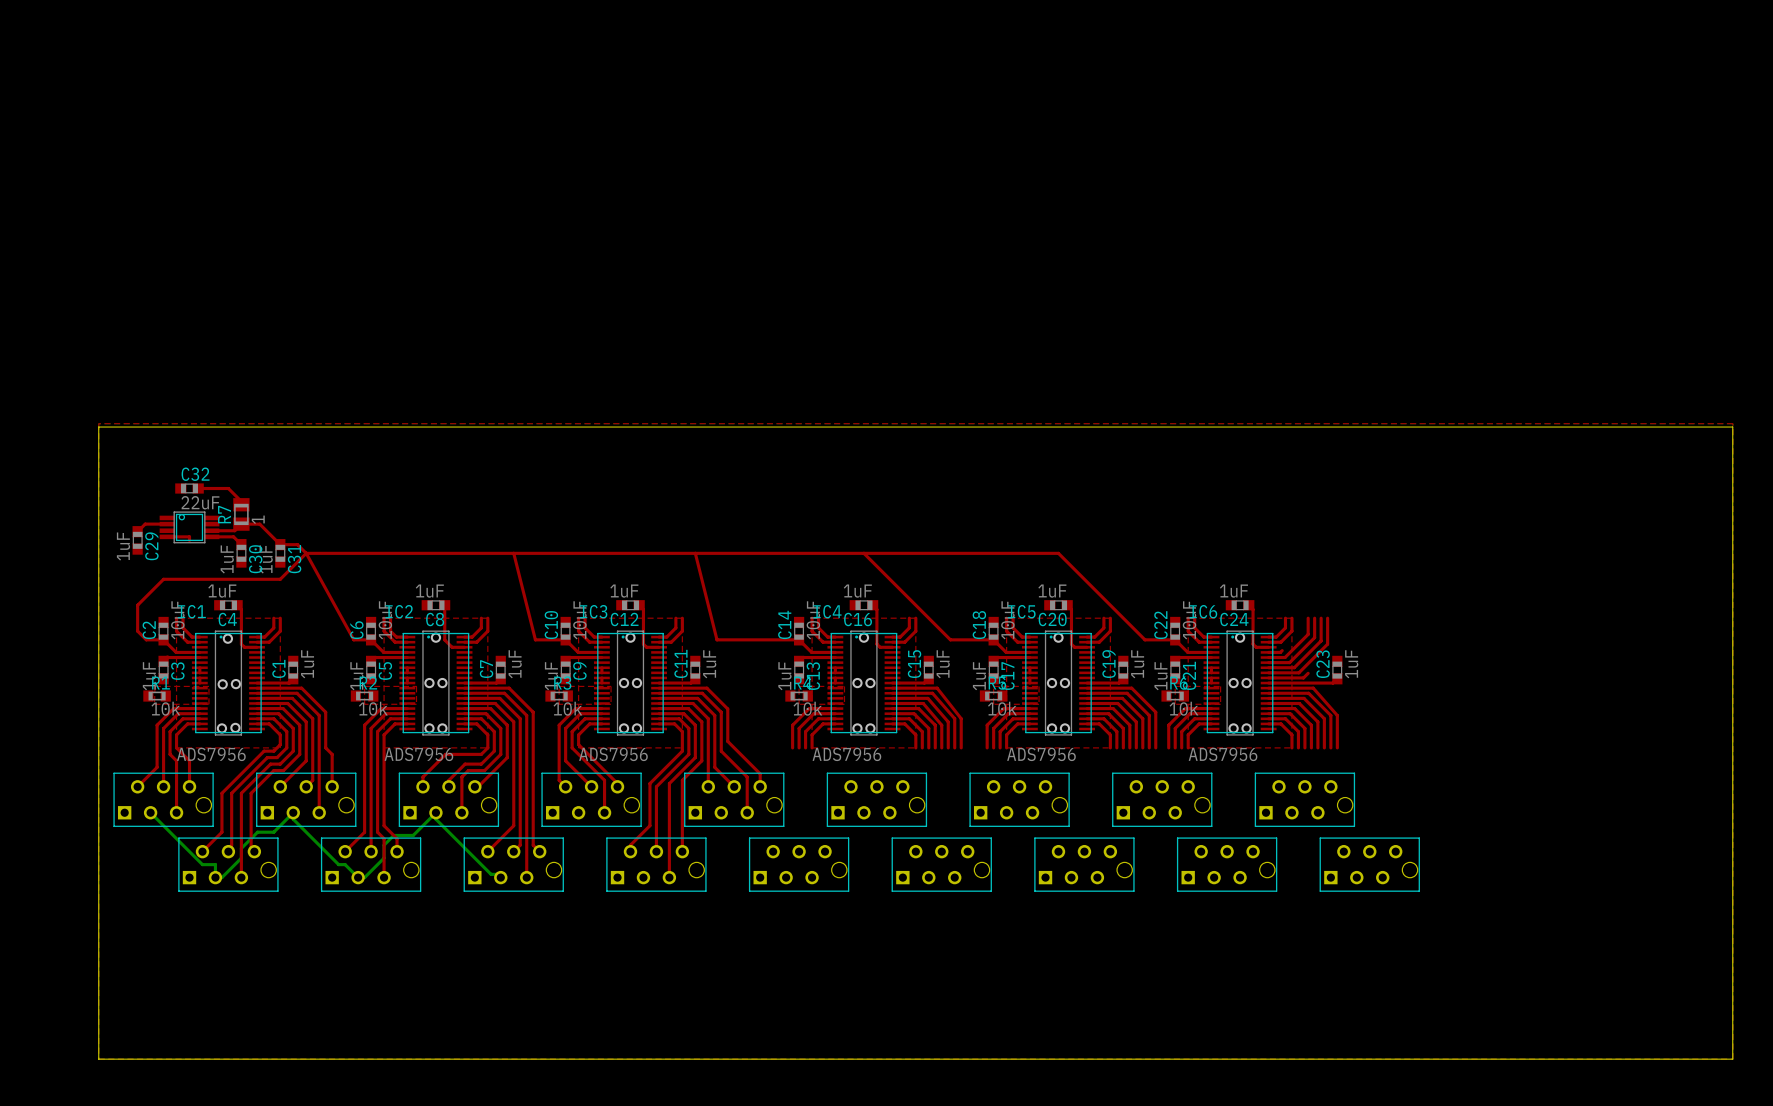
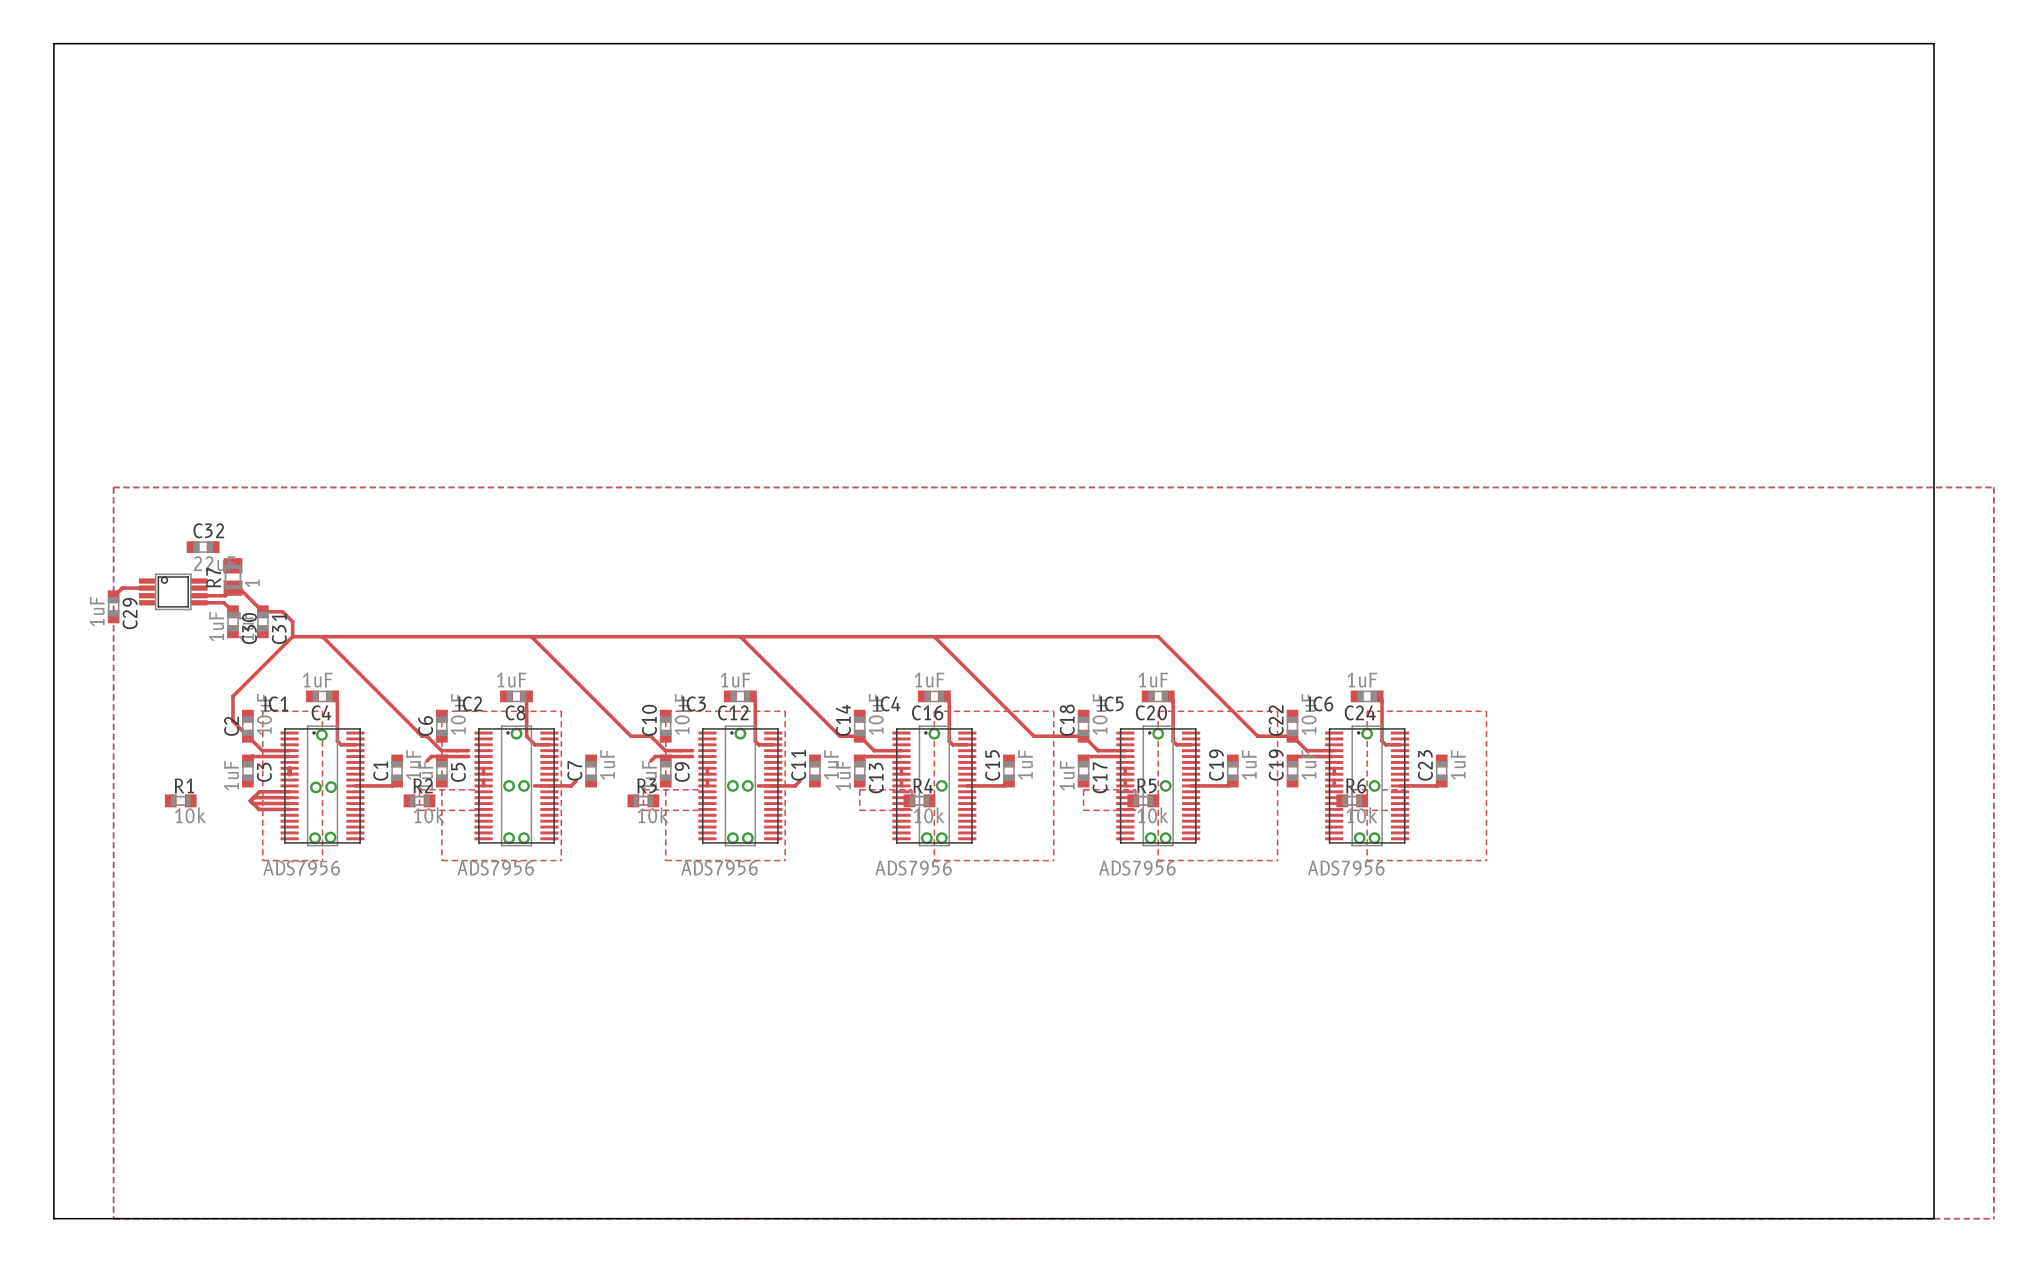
C32 position: (189, 488) -> (203, 547)
top track: (198, 488) (228, 488) (241, 501) (241, 504) -> none
R7 position: (241, 514) -> (232, 576)
top track: none -> (199, 595) (225, 595) (232, 588) (239, 588) (262, 611) (282, 611) (292, 621) (292, 636)
top track: (167, 524) (145, 524) (137, 531) -> (147, 588) (122, 588) (113, 596)
part position: (189, 527) -> (173, 591)
top track: (211, 530) (234, 530) (241, 524) (259, 524) (280, 544) (297, 544) (306, 553) -> (292, 636) (352, 636)
top track: (167, 536) (189, 536) (189, 540) -> none
top track: (211, 536) (233, 536) (241, 544) -> (199, 602) (223, 602) (232, 611)
C29 position: (137, 540) -> (113, 606)
C30 position: (241, 553) -> (232, 621)
top track: none -> (292, 636) (232, 696) (232, 721) (262, 750) (289, 750)
C31 position: (280, 553) -> (262, 621)
top track: (306, 553) (353, 639) (366, 639) -> (322, 636) (422, 736)
top track: (306, 553) (280, 579) (163, 579) (137, 605) (137, 631) (146, 639) (163, 639) (176, 652) (199, 652) -> none
top track: (513, 553) (535, 639) (548, 639) -> (531, 636) (630, 736)
top track: (695, 553) (716, 639) (729, 639) -> (740, 636) (839, 736)
top track: (863, 553) (950, 639) (993, 639) (1006, 652) (1029, 652) -> (934, 636) (1033, 736) (1083, 736) (1098, 750) (1125, 750)
top track: (1006, 553) (1058, 553) (1144, 639) (1175, 639) (1187, 652) (1211, 652) -> (1158, 636) (1257, 736) (1292, 736) (1306, 750) (1334, 750)
C4 position: (228, 605) -> (322, 696)
top track: (237, 605) (241, 609) (241, 644) (244, 647) (257, 647) -> (332, 696) (337, 701) (337, 741) (341, 744) (355, 744)
C8 position: (435, 605) -> (516, 696)
top track: (444, 605) (444, 639) (452, 647) (464, 647) -> (526, 696) (526, 736) (535, 744) (549, 744)
C12 position: (630, 605) -> (740, 696)
top track: (639, 605) (643, 609) (643, 644) (646, 647) (659, 647) -> (750, 696) (755, 701) (755, 741) (758, 744) (773, 744)
C16 position: (863, 605) -> (934, 696)
top track: (872, 605) (876, 609) (876, 644) (880, 647) (892, 647) -> (944, 696) (949, 701) (949, 741) (952, 744) (967, 744)
C20 position: (1058, 605) -> (1158, 696)
top track: (1067, 605) (1071, 609) (1071, 644) (1074, 647) (1087, 647) -> (1168, 696) (1173, 701) (1173, 741) (1176, 744) (1191, 744)
C24 position: (1240, 605) -> (1367, 696)
top track: (1248, 605) (1253, 609) (1253, 644) (1256, 647) (1268, 647) -> (1377, 696) (1382, 701) (1382, 741) (1385, 744) (1400, 744)
top track: (176, 618) (176, 631) (187, 642) (199, 642) -> none
top track: (183, 618) (183, 627) (192, 637) (199, 637) -> none
top zone outline: (228, 618) (176, 618) (176, 747) (228, 747) -> (262, 711) (262, 860)
top track: (273, 618) (273, 627) (264, 637) (257, 637) -> none
top track: (280, 618) (280, 631) (269, 642) (257, 642) -> none
top track: (384, 618) (384, 631) (395, 642) (407, 642) -> none
top track: (390, 618) (390, 631) (396, 637) (407, 637) -> none
top track: (481, 618) (481, 627) (472, 637) (464, 637) -> none
top track: (487, 618) (487, 631) (476, 642) (464, 642) -> none
top track: (578, 618) (578, 631) (589, 642) (601, 642) -> none
top track: (585, 618) (585, 627) (594, 637) (601, 637) -> none
top track: (675, 618) (675, 627) (666, 637) (659, 637) -> none
top track: (682, 618) (682, 631) (671, 642) (659, 642) -> none
top track: (812, 618) (812, 631) (823, 642) (835, 642) -> none
top track: (818, 618) (818, 627) (827, 637) (835, 637) -> none
top track: (909, 618) (909, 627) (900, 637) (892, 637) -> none
top track: (915, 618) (915, 631) (904, 642) (892, 642) -> none
top track: (1006, 618) (1006, 631) (1017, 642) (1029, 642) -> none
top track: (1013, 618) (1013, 627) (1022, 637) (1029, 637) -> none
top track: (1103, 618) (1103, 627) (1094, 637) (1087, 637) -> none
top track: (1110, 618) (1110, 631) (1099, 642) (1087, 642) -> none
top track: (1188, 618) (1188, 631) (1199, 642) (1211, 642) -> none
top track: (1194, 618) (1194, 627) (1203, 637) (1211, 637) -> none
top track: (1285, 618) (1285, 627) (1276, 637) (1268, 637) -> none
top track: (1291, 618) (1291, 631) (1280, 642) (1268, 642) -> none
top track: (1308, 618) (1308, 634) (1285, 657) (1268, 657) -> none
top track: (1314, 618) (1314, 637) (1289, 662) (1268, 662) -> none
top track: (1321, 618) (1321, 640) (1294, 667) (1268, 667) -> none
top track: (1327, 618) (1327, 644) (1298, 672) (1268, 672) -> none
C2 position: (163, 631) -> (247, 726)
C6 position: (371, 631) -> (441, 726)
C10 position: (565, 631) -> (665, 726)
C14 position: (799, 631) -> (859, 726)
C18 position: (993, 631) -> (1083, 726)
C22 position: (1175, 631) -> (1292, 726)
via position: (435, 637) -> (516, 733)
via position: (630, 637) -> (740, 733)
via: none -> (934, 733)
via: (863, 637) -> none
via: none -> (1158, 733)
via: (1058, 637) -> none
via: none -> (1367, 733)
via: (1240, 637) -> none
via: (227, 638) -> none
via: none -> (321, 734)
top track: (747, 639) (799, 639) (811, 652) (835, 652) -> (859, 736) (874, 750) (901, 750)
top track: (1282, 650) (1280, 652) (1268, 652) -> none
top track: (199, 657) (167, 657) (163, 661) -> (289, 756) (252, 756) (247, 761)
top track: (835, 657) (802, 657) (799, 661) -> (901, 756) (864, 756) (859, 761)
top track: (1029, 657) (997, 657) (993, 661) -> (1125, 756) (1088, 756) (1083, 761)
top track: (1211, 657) (1179, 657) (1175, 661) -> (1334, 756) (1296, 756) (1292, 761)
top track: (199, 667) (199, 672) -> (289, 768) (289, 774)
top track: (407, 667) (407, 672) -> (483, 768) (483, 774)
top track: (601, 667) (601, 672) -> (707, 768) (707, 774)
top track: (835, 667) (835, 672) -> (901, 768) (901, 774)
top track: (1029, 667) (1029, 672) -> (1125, 768) (1125, 774)
top track: (1211, 667) (1211, 672) -> (1334, 768) (1334, 774)
C3 position: (163, 670) -> (247, 770)
C1 position: (293, 670) -> (397, 770)
C5 position: (371, 670) -> (441, 770)
C7 position: (500, 670) -> (591, 770)
C9 position: (565, 670) -> (665, 770)
C11 position: (695, 670) -> (814, 770)
C13 position: (799, 670) -> (859, 770)
C15 position: (928, 670) -> (1008, 770)
C17 position: (993, 670) -> (1083, 770)
C19: none -> 1uF (1232, 770)
C21: 1uF (1175, 670) -> none
C23 position: (1337, 670) -> (1441, 770)
top track: (1308, 673) (1303, 677) (1268, 677) -> none
top track: (199, 677) (199, 683) -> none
top track: (407, 677) (407, 683) -> (483, 780) (483, 785)
top track: (601, 677) (601, 683) -> (707, 780) (707, 785)
top track: (835, 677) (835, 683) -> (901, 780) (901, 785)
top track: (1029, 677) (1029, 683) -> (1125, 780) (1125, 785)
top track: (1211, 677) (1211, 683) -> (1334, 780) (1334, 785)
top track: (293, 678) (288, 683) (257, 683) -> (397, 780) (392, 785) (355, 785)
top track: (928, 678) (924, 683) (892, 683) -> (1008, 780) (1004, 785) (967, 785)
top track: (1123, 678) (1119, 683) (1087, 683) -> (1232, 780) (1227, 785) (1191, 785)
top track: none -> (1441, 780) (1436, 785) (1400, 785)
top track: (1337, 678) (1333, 683) (1268, 683) -> none
IC1 position: (228, 683) -> (322, 785)
via: (429, 683) -> none
IC2 position: (435, 683) -> (516, 785)
via: none -> (523, 785)
via: (624, 683) -> none
IC3 position: (630, 683) -> (740, 785)
via: none -> (747, 785)
via: none -> (941, 785)
via: (857, 683) -> none
IC4 position: (863, 683) -> (934, 785)
via: (870, 683) -> none
via: none -> (1165, 785)
via: (1052, 683) -> none
IC5 position: (1058, 683) -> (1158, 785)
via: (1064, 683) -> none
via: none -> (1374, 785)
via: (1233, 683) -> none
IC6 position: (1240, 683) -> (1367, 785)
via: (1246, 683) -> none
via: (222, 684) -> none
via: (235, 684) -> none
via: none -> (315, 787)
via: none -> (331, 787)
top zone outline: (155, 686) (208, 686) (208, 704) (154, 704) (155, 686) -> none
top zone outline: (799, 686) (844, 686) (844, 704) (799, 704) (799, 686) -> (859, 789) (911, 789) (911, 810) (859, 810) (859, 789)
top zone outline: (993, 686) (1039, 686) (1039, 704) (993, 704) (993, 686) -> (1083, 789) (1135, 789) (1135, 810) (1083, 810) (1083, 789)
top track: none -> (289, 791) (259, 791) (250, 800) (259, 809) (289, 809)
top track: (257, 688) (301, 688) (325, 712) (325, 747) (332, 754) (332, 786) -> none
top track: (464, 688) (509, 688) (533, 712) (533, 845) (539, 851) -> none
top track: (659, 688) (706, 688) (727, 708) (727, 741) (760, 773) (760, 786) -> none
top track: (892, 688) (937, 688) (961, 718) (961, 747) -> none
top track: (1087, 688) (1131, 688) (1155, 712) (1155, 747) -> none
top track: (1268, 688) (1313, 688) (1337, 715) (1337, 747) -> none
top track: none -> (253, 797) (289, 797)
top track: (257, 693) (297, 693) (319, 715) (319, 812) -> none
top track: (464, 693) (504, 693) (526, 715) (526, 877) -> none
top track: (659, 693) (702, 693) (721, 712) (721, 751) (747, 777) (747, 812) -> none
top track: (892, 693) (932, 693) (954, 718) (954, 747) -> none
top track: (1087, 693) (1127, 693) (1149, 715) (1149, 747) -> none
top track: (1268, 693) (1308, 693) (1330, 715) (1330, 747) -> none
top track: none -> (253, 803) (289, 803)
top track: (257, 698) (292, 698) (312, 718) (312, 780) (306, 786) -> none
top track: (464, 698) (499, 698) (520, 718) (520, 845) (513, 851) -> none
top track: (659, 698) (697, 698) (714, 715) (714, 767) (734, 786) -> none
top track: (892, 698) (927, 698) (948, 721) (948, 747) -> none
top track: (1087, 698) (1122, 698) (1142, 718) (1142, 747) -> none
top track: (1268, 698) (1304, 698) (1324, 718) (1324, 747) -> none
top track: (257, 703) (287, 703) (306, 721) (306, 760) (280, 786) -> none
top track: (464, 703) (495, 703) (513, 721) (513, 825) (487, 851) -> none
top track: (659, 703) (693, 703) (708, 718) (708, 786) -> none
top track: (892, 703) (923, 703) (941, 725) (941, 747) -> none
top track: (1087, 703) (1117, 703) (1136, 721) (1136, 747) -> none
top track: (1268, 703) (1299, 703) (1317, 721) (1317, 747) -> none
top track: (199, 708) (173, 708) (157, 725) (157, 767) (137, 786) -> none
top track: (257, 708) (283, 708) (299, 725) (299, 754) (283, 770) (273, 770) (251, 793) (251, 848) (254, 851) -> none
top track: (407, 708) (381, 708) (364, 725) (364, 832) (345, 851) -> none
top track: (464, 708) (490, 708) (507, 725) (507, 757) (478, 786) (474, 786) -> none
top track: (601, 708) (575, 708) (559, 725) (559, 780) (565, 786) -> none
top track: (659, 708) (688, 708) (701, 721) (701, 760) (682, 780) (682, 851) -> none
top track: (835, 708) (809, 708) (792, 725) (792, 747) -> none
top track: (892, 708) (918, 708) (935, 725) (935, 747) -> none
top track: (1029, 708) (1003, 708) (987, 725) (987, 747) -> none
top track: (1087, 708) (1113, 708) (1129, 725) (1129, 747) -> none
top track: (1211, 708) (1185, 708) (1168, 725) (1168, 747) -> none
top track: (1268, 708) (1294, 708) (1311, 725) (1311, 747) -> none
top track: (199, 713) (178, 713) (163, 728) (163, 786) -> none
top track: (257, 713) (278, 713) (293, 728) (293, 751) (280, 764) (270, 764) (241, 793) (241, 877) -> none
top track: (407, 713) (385, 713) (371, 728) (371, 851) -> none
top track: (464, 713) (486, 713) (500, 728) (500, 754) (484, 770) (468, 770) (461, 777) (461, 812) -> none
top track: (601, 713) (580, 713) (565, 728) (565, 760) (591, 786) -> none
top track: (659, 713) (683, 713) (695, 725) (695, 757) (669, 783) (669, 877) -> none
top track: (835, 713) (813, 713) (799, 728) (799, 747) -> none
top track: (892, 713) (914, 713) (928, 728) (928, 747) -> none
top track: (1029, 713) (1008, 713) (993, 728) (993, 747) -> none
top track: (1087, 713) (1108, 713) (1123, 728) (1123, 747) -> none
top track: (1211, 713) (1189, 713) (1175, 728) (1175, 747) -> none
top track: (1268, 713) (1290, 713) (1304, 728) (1304, 747) -> none
top track: (199, 718) (182, 718) (170, 731) (170, 754) (176, 760) (176, 812) -> none
top track: (257, 718) (273, 718) (286, 731) (286, 747) (277, 757) (267, 757) (231, 793) (231, 845) (228, 851) -> none
top track: (407, 718) (390, 718) (377, 731) (377, 832) (384, 838) (384, 877) -> none
top track: (464, 718) (481, 718) (494, 731) (494, 751) (481, 764) (465, 764) (448, 780) (448, 786) -> none
top track: (601, 718) (585, 718) (572, 731) (572, 747) (604, 780) (604, 812) -> none
top track: (659, 718) (679, 718) (688, 728) (688, 754) (656, 786) (656, 851) -> none
top track: (835, 718) (818, 718) (805, 731) (805, 747) -> none
top track: (892, 718) (909, 718) (922, 731) (922, 747) -> none
top track: (1029, 718) (1013, 718) (1000, 731) (1000, 747) -> none
top track: (1087, 718) (1103, 718) (1116, 731) (1116, 747) -> none
top track: (1211, 718) (1194, 718) (1181, 731) (1181, 747) -> none
top track: (1268, 718) (1285, 718) (1298, 731) (1298, 747) -> none
top track: (199, 723) (187, 723) (176, 734) (176, 747) (189, 760) (189, 786) -> none
top track: (257, 723) (269, 723) (280, 734) (280, 744) (273, 751) (264, 751) (221, 793) (221, 832) (202, 851) -> none
top track: (407, 723) (395, 723) (384, 734) (384, 825) (397, 838) (397, 851) -> none
top track: (464, 723) (476, 723) (487, 734) (487, 747) (481, 754) (445, 754) (422, 777) (422, 786) -> none
top track: (601, 723) (589, 723) (578, 734) (578, 744) (617, 783) (617, 786) -> none
top track: (659, 723) (674, 723) (682, 731) (682, 751) (649, 783) (649, 825) (630, 845) (630, 851) -> none
top track: (835, 723) (823, 723) (812, 734) (812, 747) -> none
top track: (892, 723) (904, 723) (915, 734) (915, 747) -> none
top track: (1029, 723) (1017, 723) (1006, 734) (1006, 747) -> none
top track: (1087, 723) (1099, 723) (1110, 734) (1110, 747) -> none
top track: (1211, 723) (1199, 723) (1188, 734) (1188, 747) -> none
top track: (1268, 723) (1280, 723) (1291, 734) (1291, 747) -> none
via: (235, 727) -> none
via: none -> (330, 837)
via: (221, 728) -> none
via: none -> (315, 838)
via position: (429, 728) -> (523, 838)
via position: (624, 728) -> (747, 838)
via: none -> (926, 838)
via: none -> (941, 838)
via: (857, 728) -> none
via: (870, 728) -> none
via: none -> (1150, 838)
via: none -> (1165, 838)
via: (1052, 728) -> none
via: (1064, 728) -> none
via: none -> (1359, 838)
via: none -> (1374, 838)
via: (1233, 728) -> none
via: (1246, 728) -> none
part: (163, 799) -> none
part: (306, 799) -> none
part: (448, 799) -> none
part: (591, 799) -> none
part: (734, 799) -> none
part: (876, 799) -> none
part: (1019, 799) -> none
part: (1162, 799) -> none
part: (1304, 799) -> none
bottom track: (150, 812) (202, 864) (215, 864) (215, 877) (221, 877) (241, 858) (241, 848) (257, 832) (273, 832) (293, 812) (293, 819) (338, 864) (345, 864) (358, 877) (364, 877) (384, 858) (384, 845) (393, 835) (413, 835) (435, 812) (435, 819) (491, 874) (497, 874) (500, 877) -> none
part: (228, 864) -> none
part: (371, 864) -> none
part: (513, 864) -> none
part: (656, 864) -> none
part: (799, 864) -> none
part: (941, 864) -> none
part: (1084, 864) -> none
part: (1227, 864) -> none
part: (1369, 864) -> none
board edge: (98, 1059) (98, 427) (1732, 427) (1732, 1059) (1680, 1059) -> (113, 1218) (53, 1218) (53, 43) (1933, 43) (1933, 1218)

